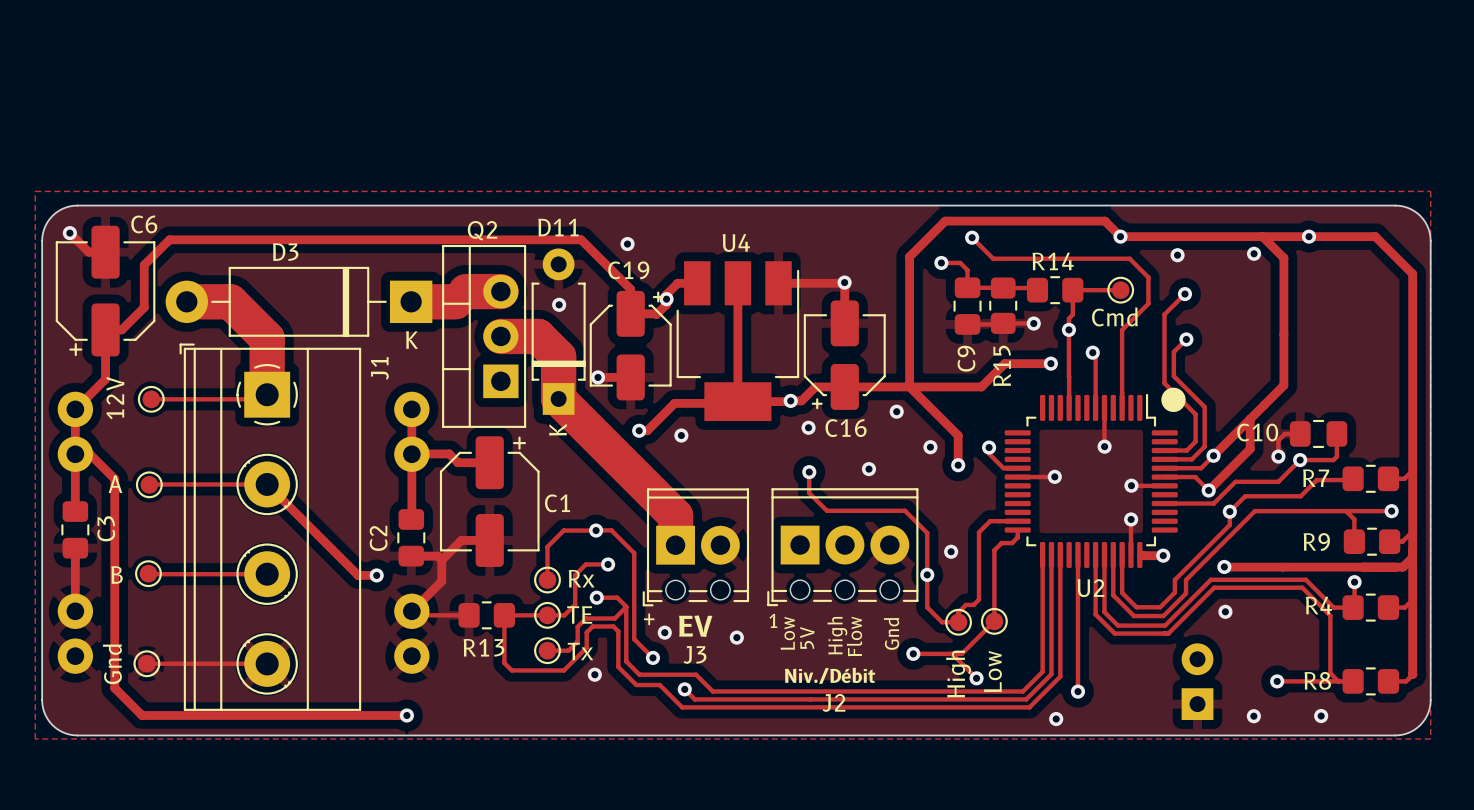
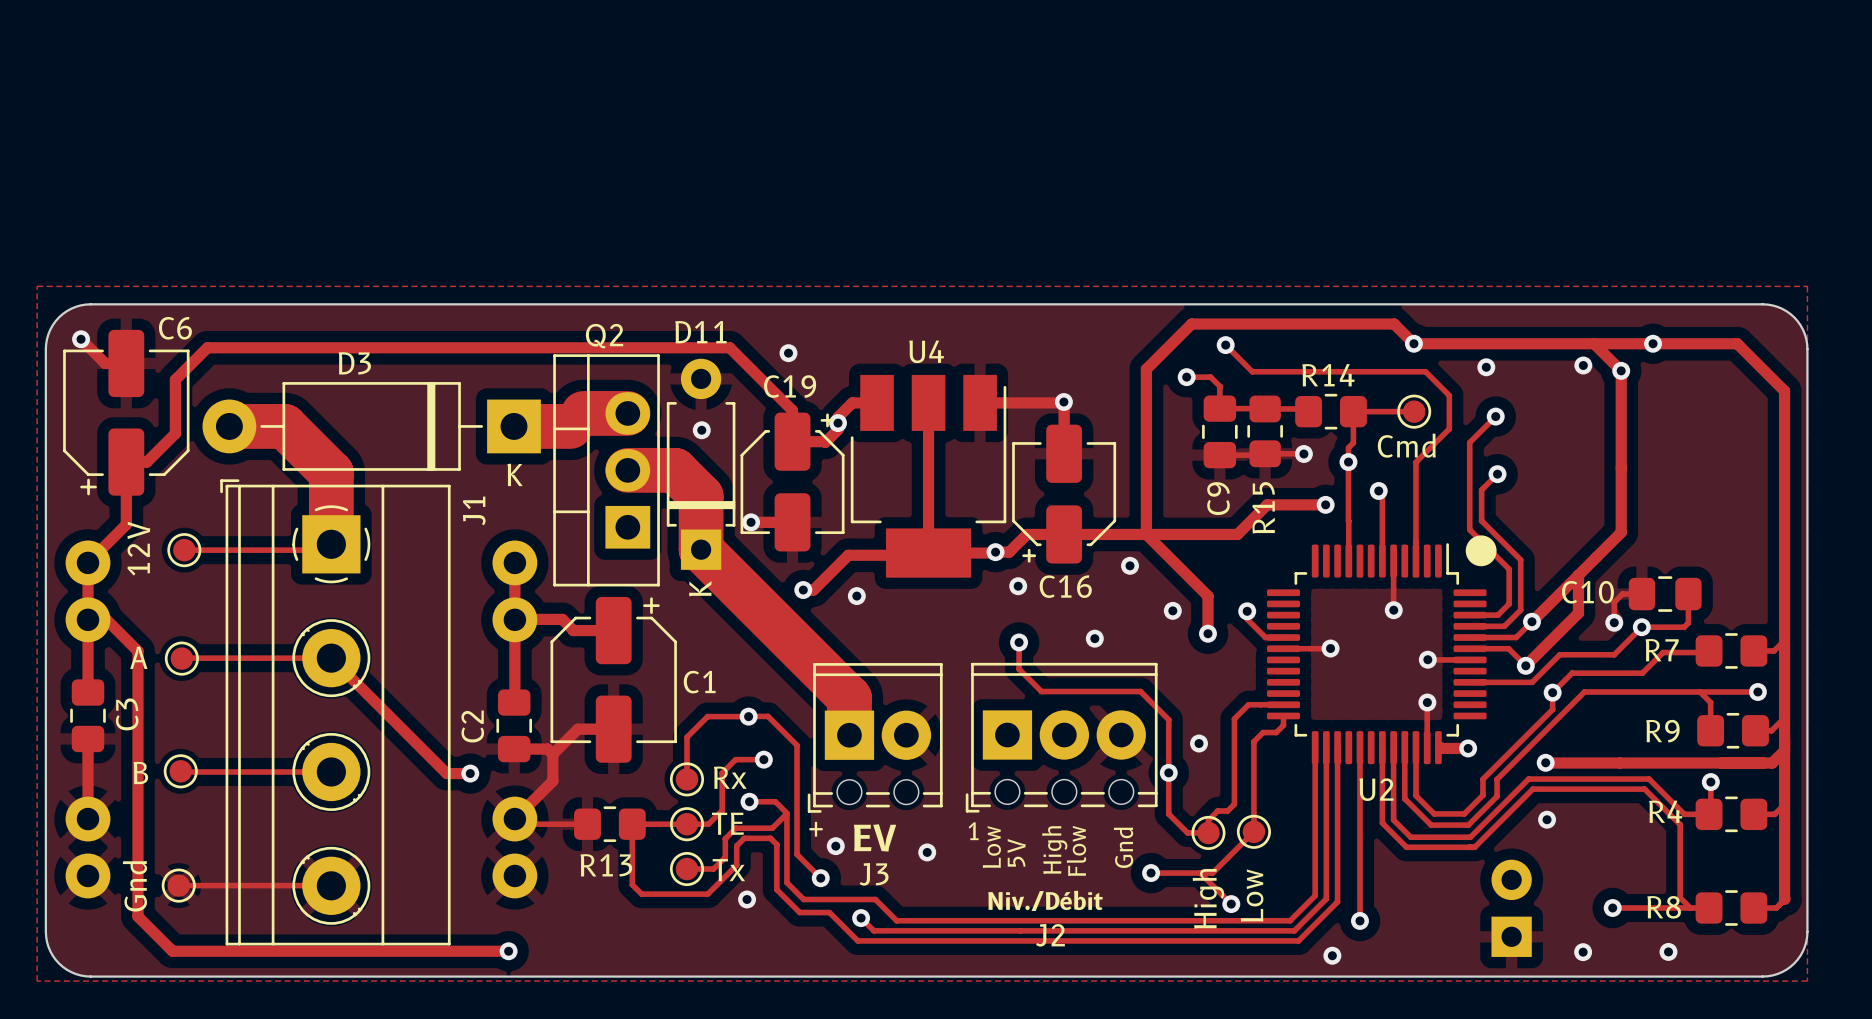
via: none -> (1621, 370)

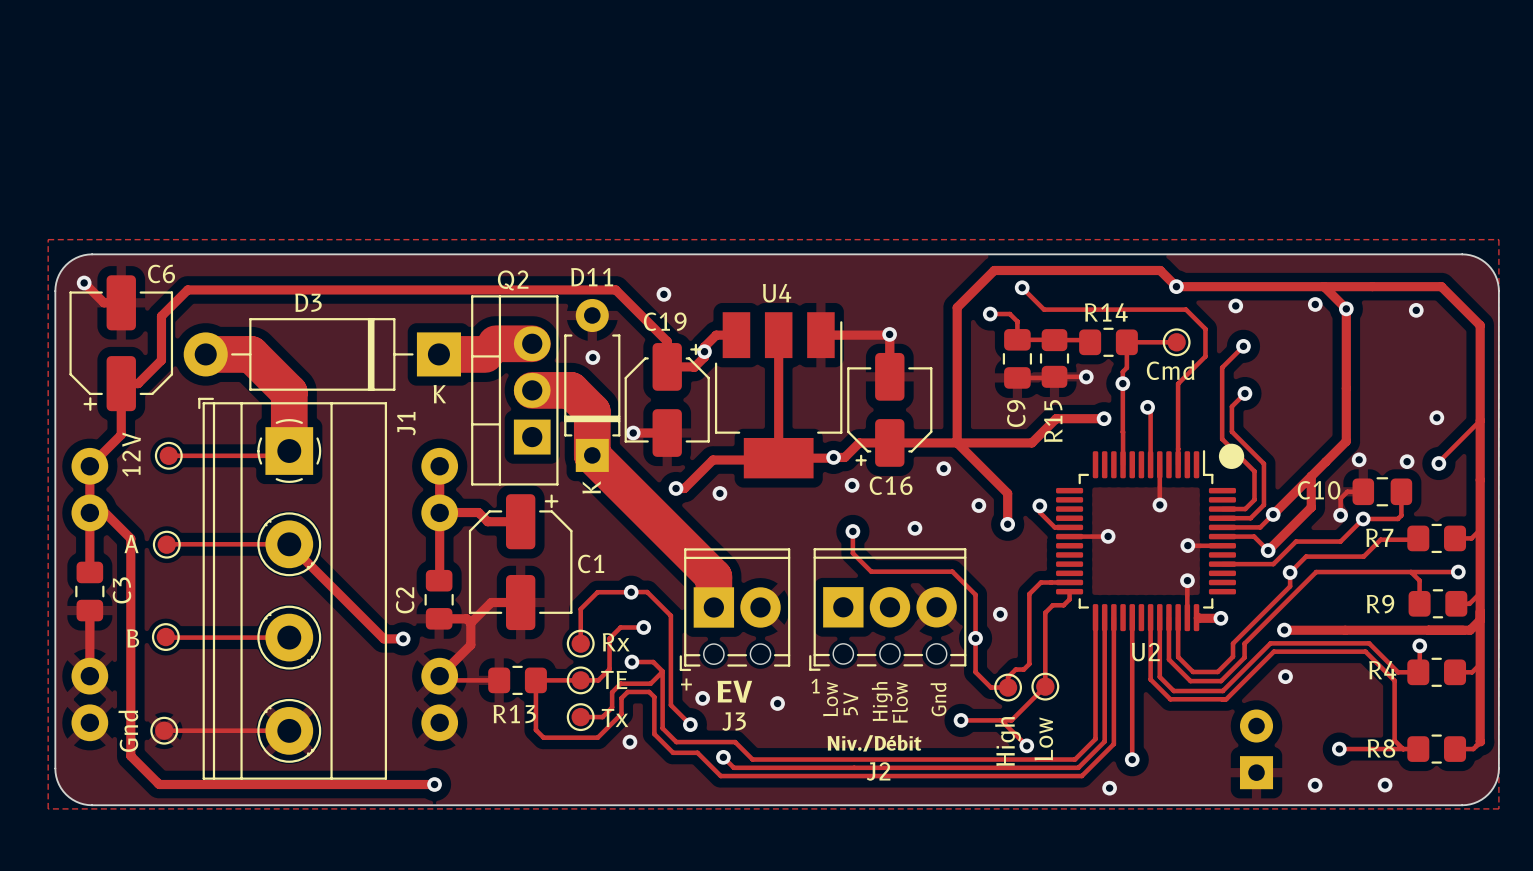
via position: (1653, 343) -> (1416, 310)
via: none -> (1436, 417)
track: none -> (1480, 420) (1438, 463)
via: none -> (1359, 459)
via: none -> (1407, 461)
via: none -> (1438, 463)

